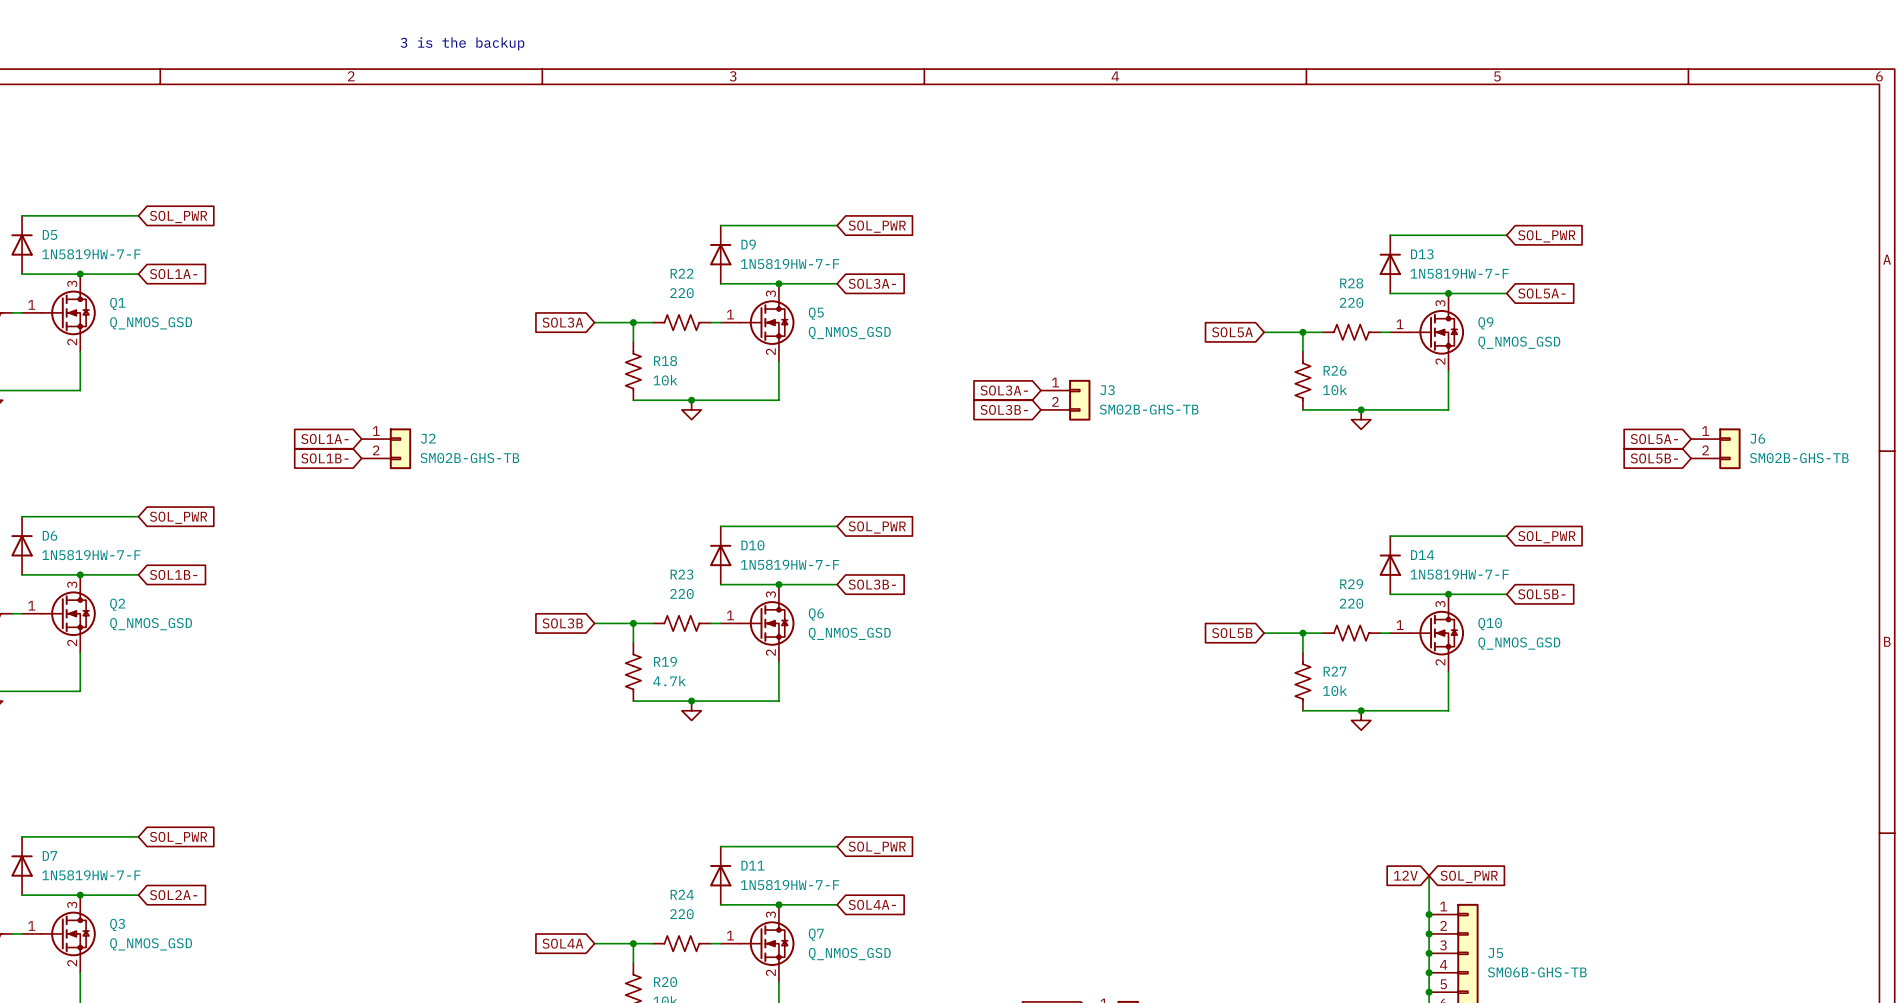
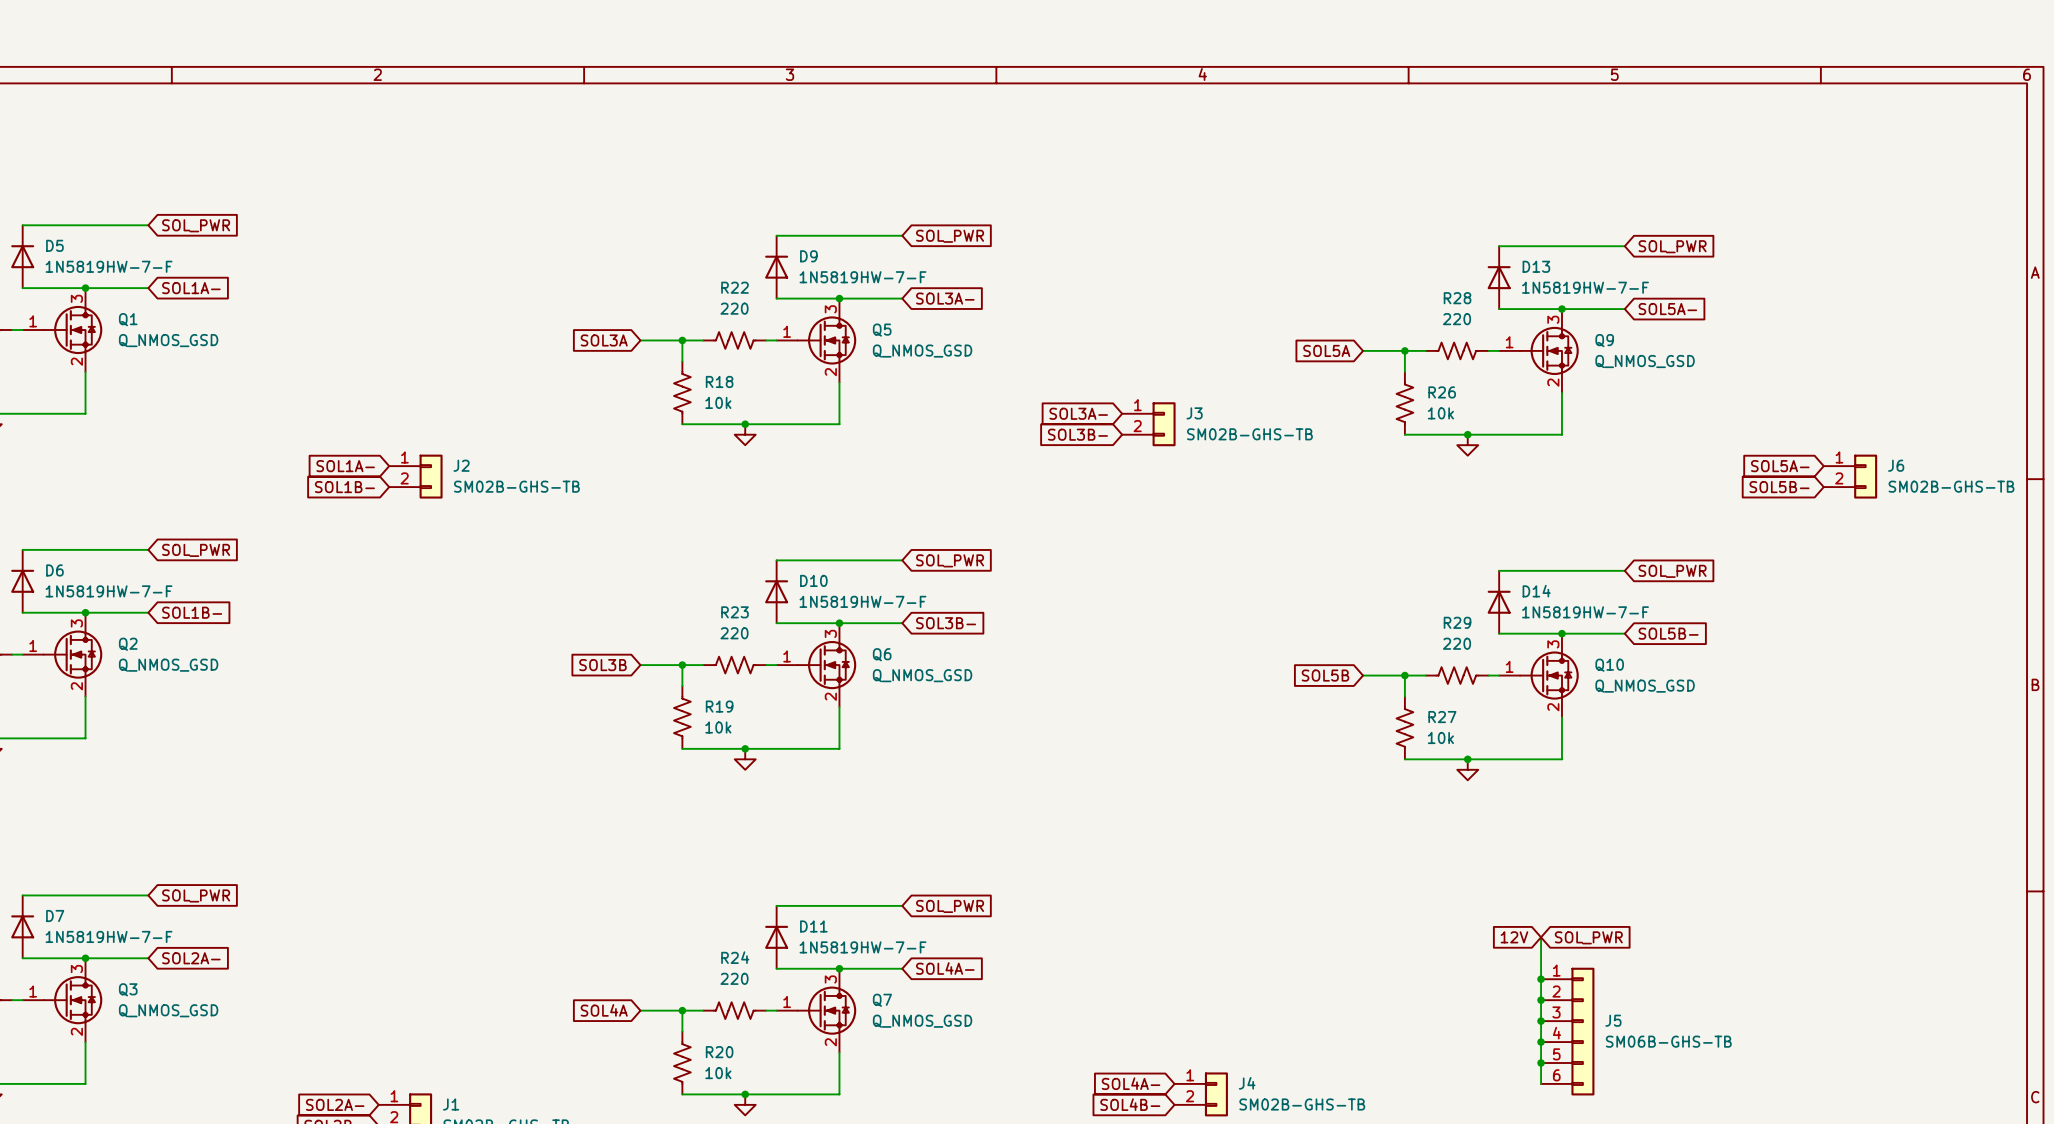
text: 3 is the backup (462, 43) -> none
R19 value: 4.7k (669, 681) -> 10k (718, 727)

